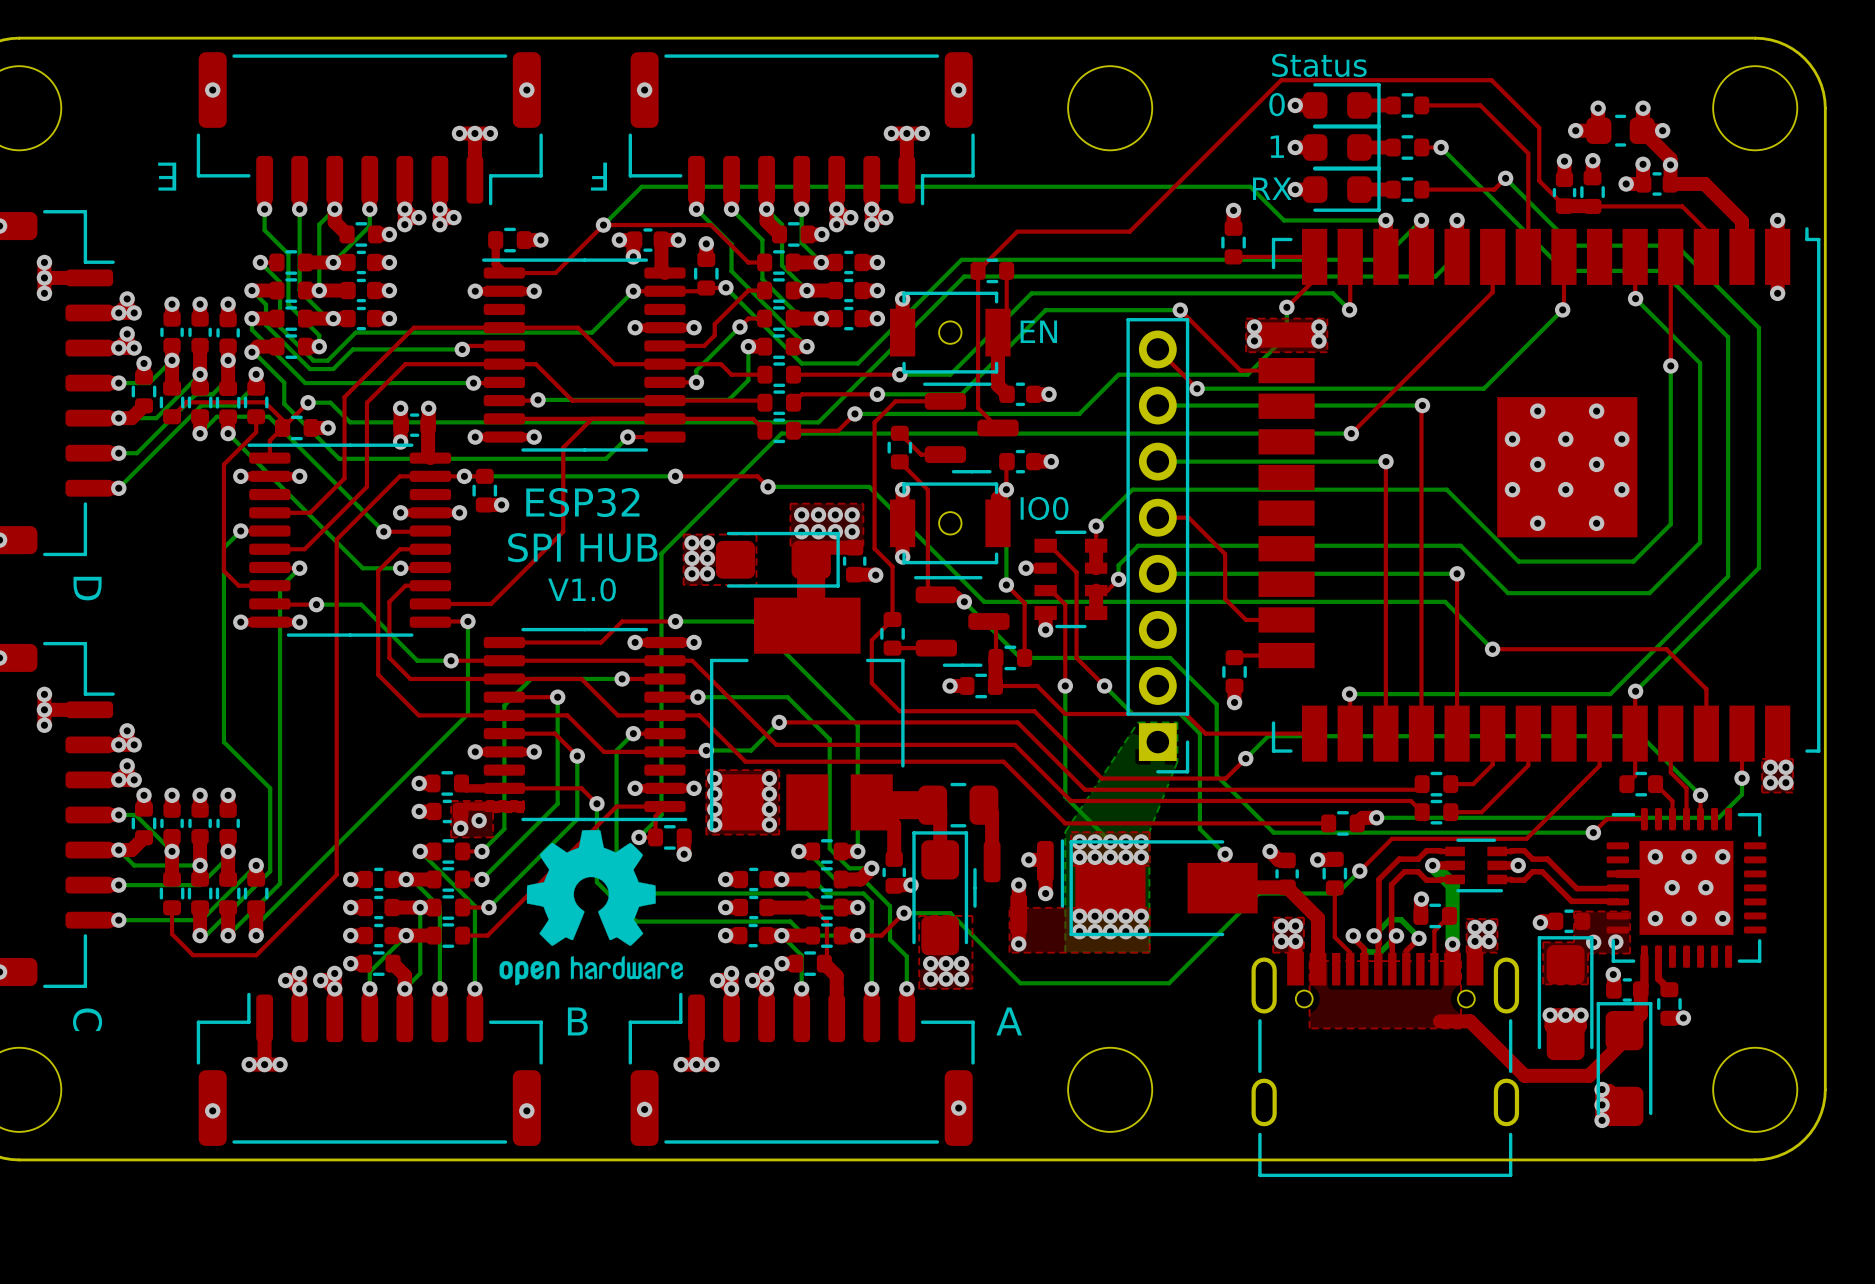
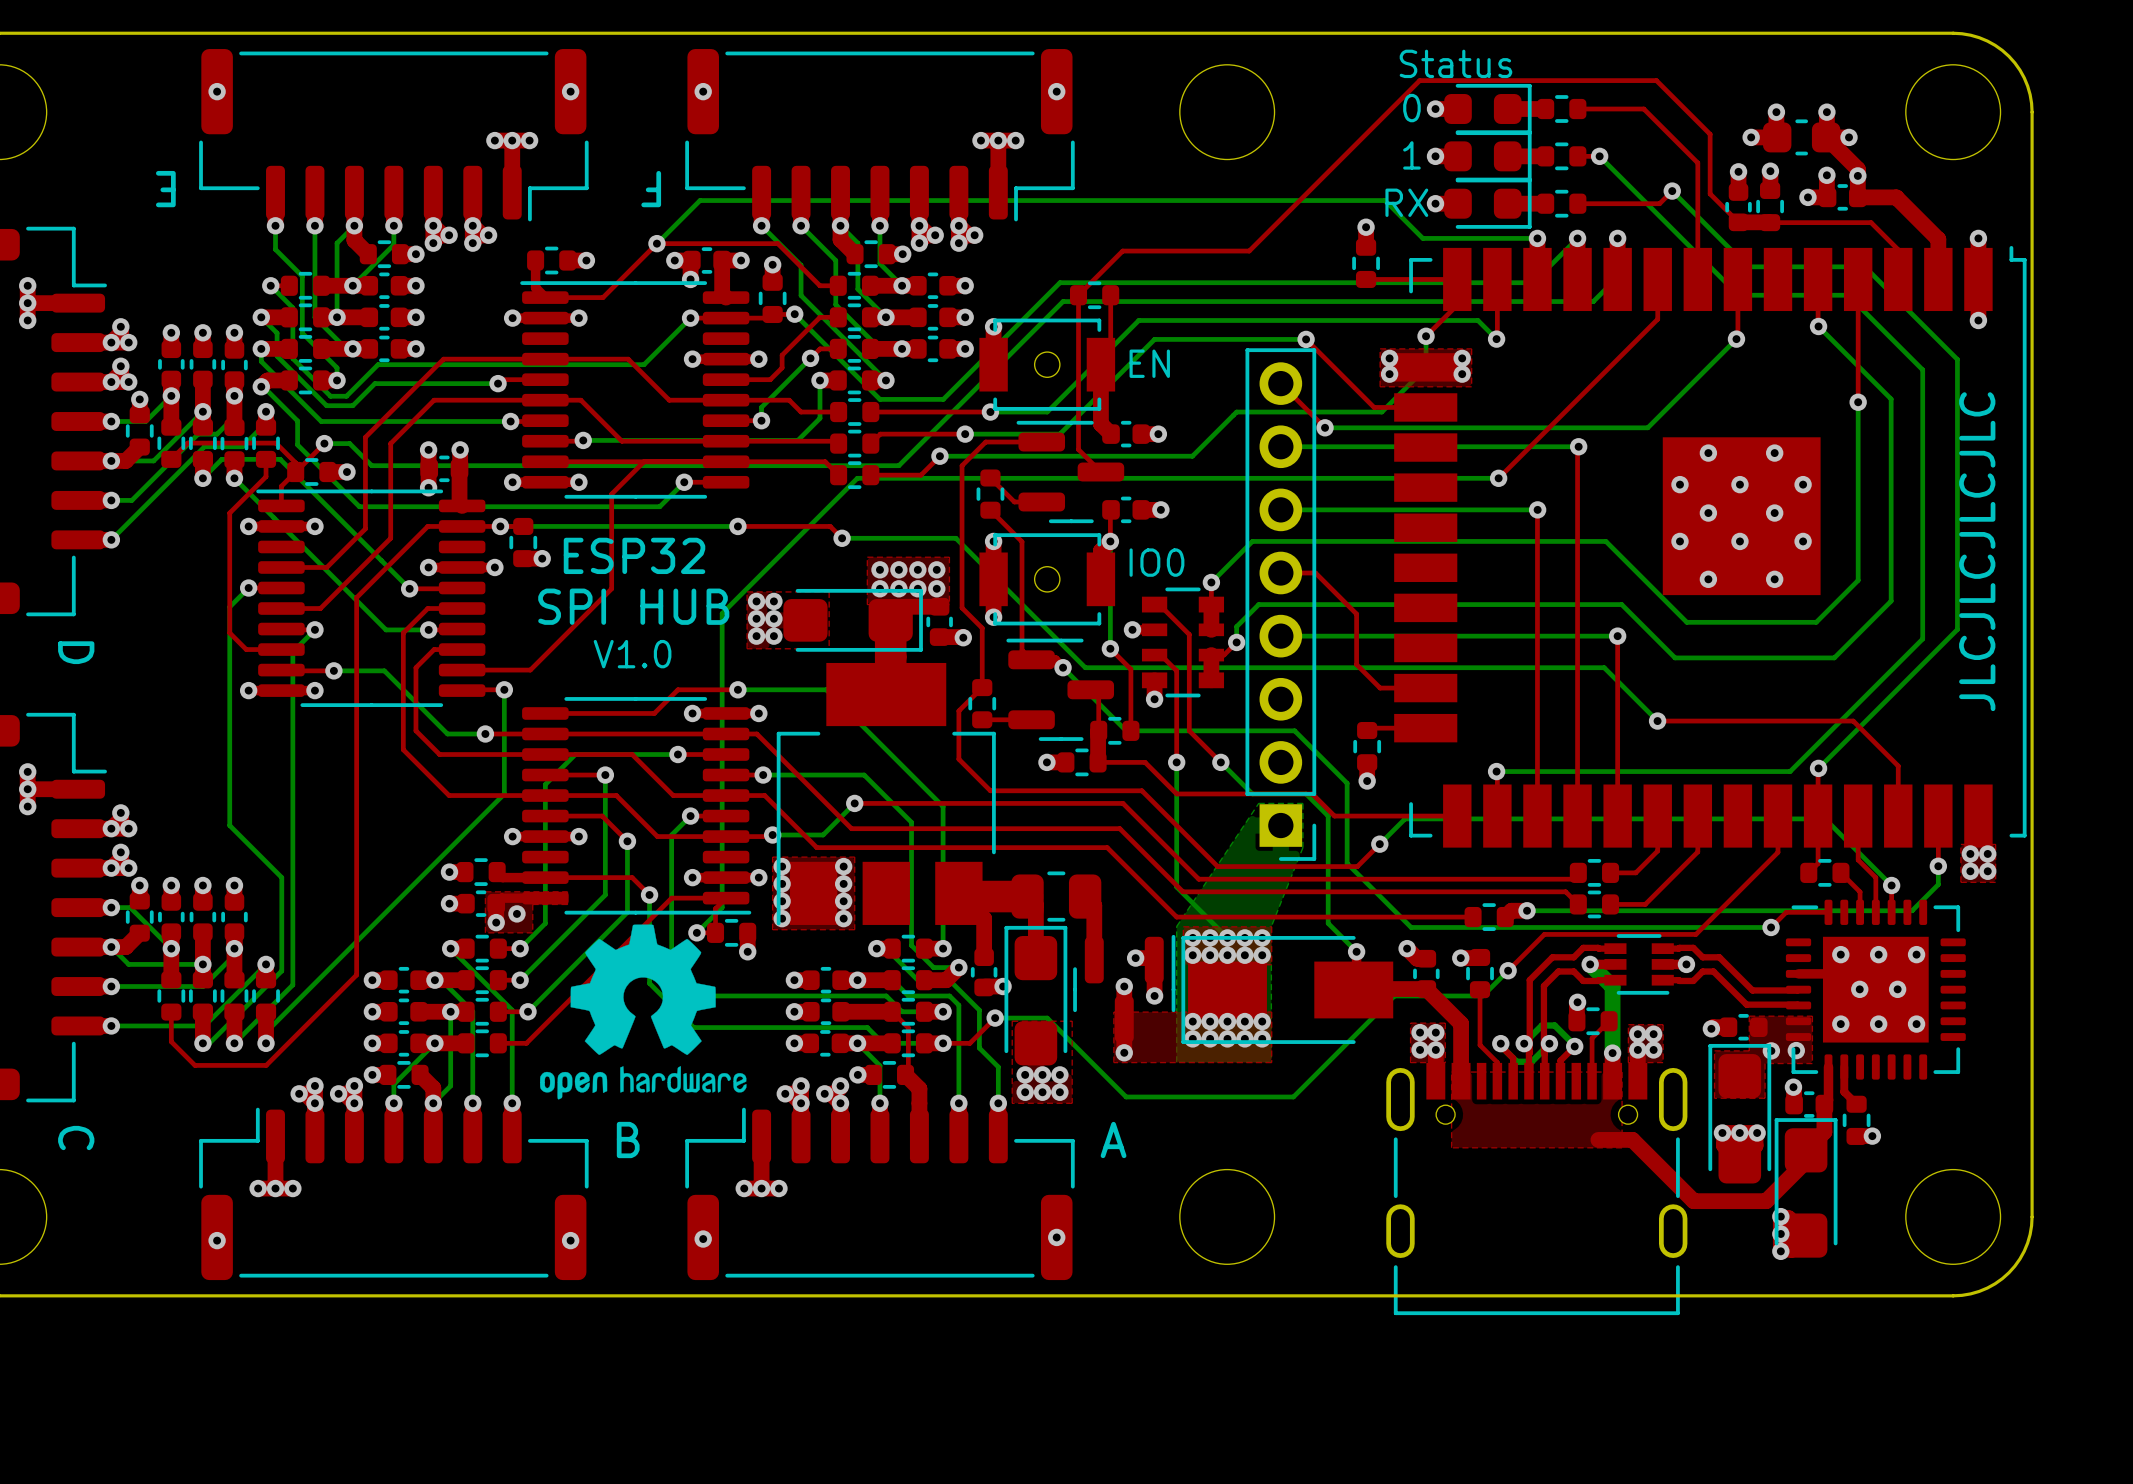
text: none -> JLCJLCJLCJLC (1977, 551)

